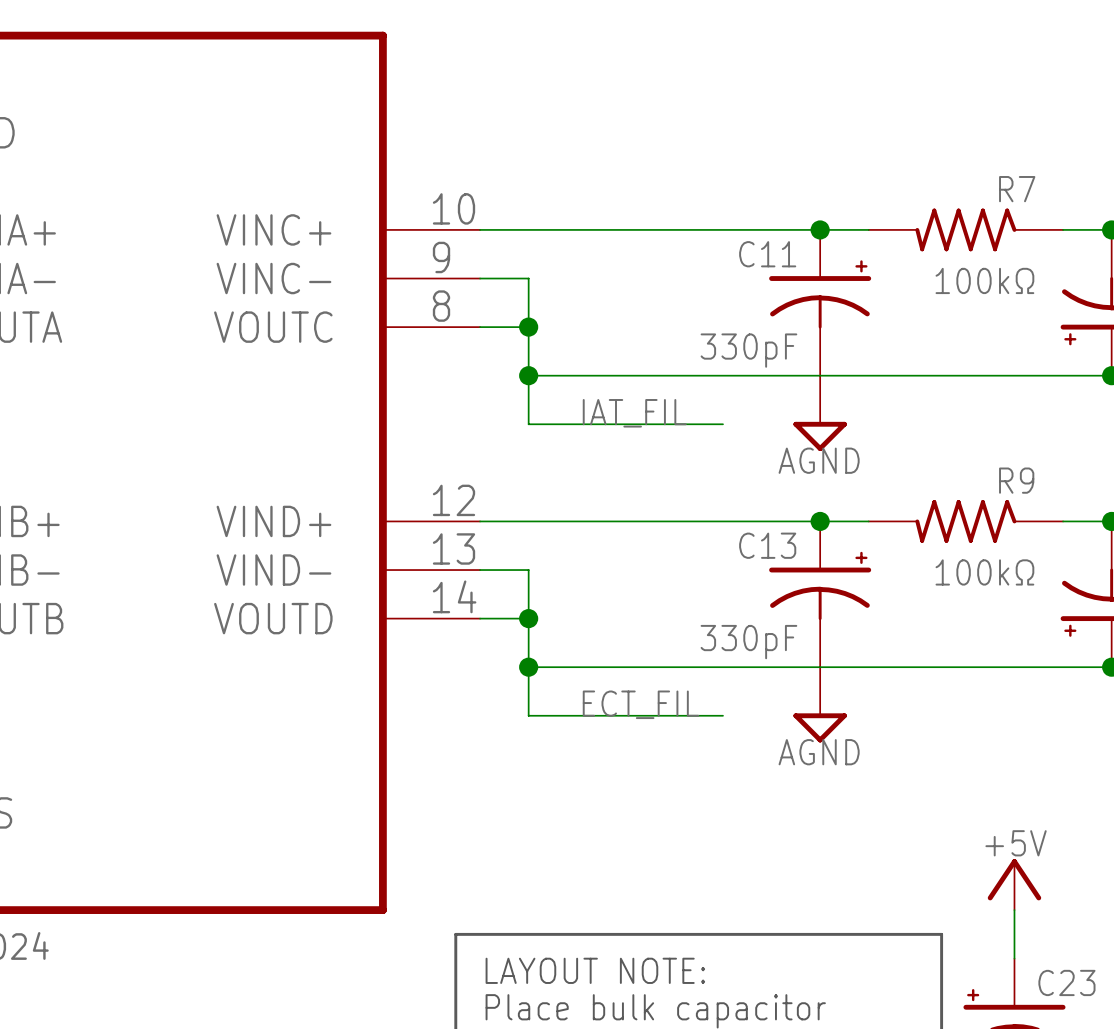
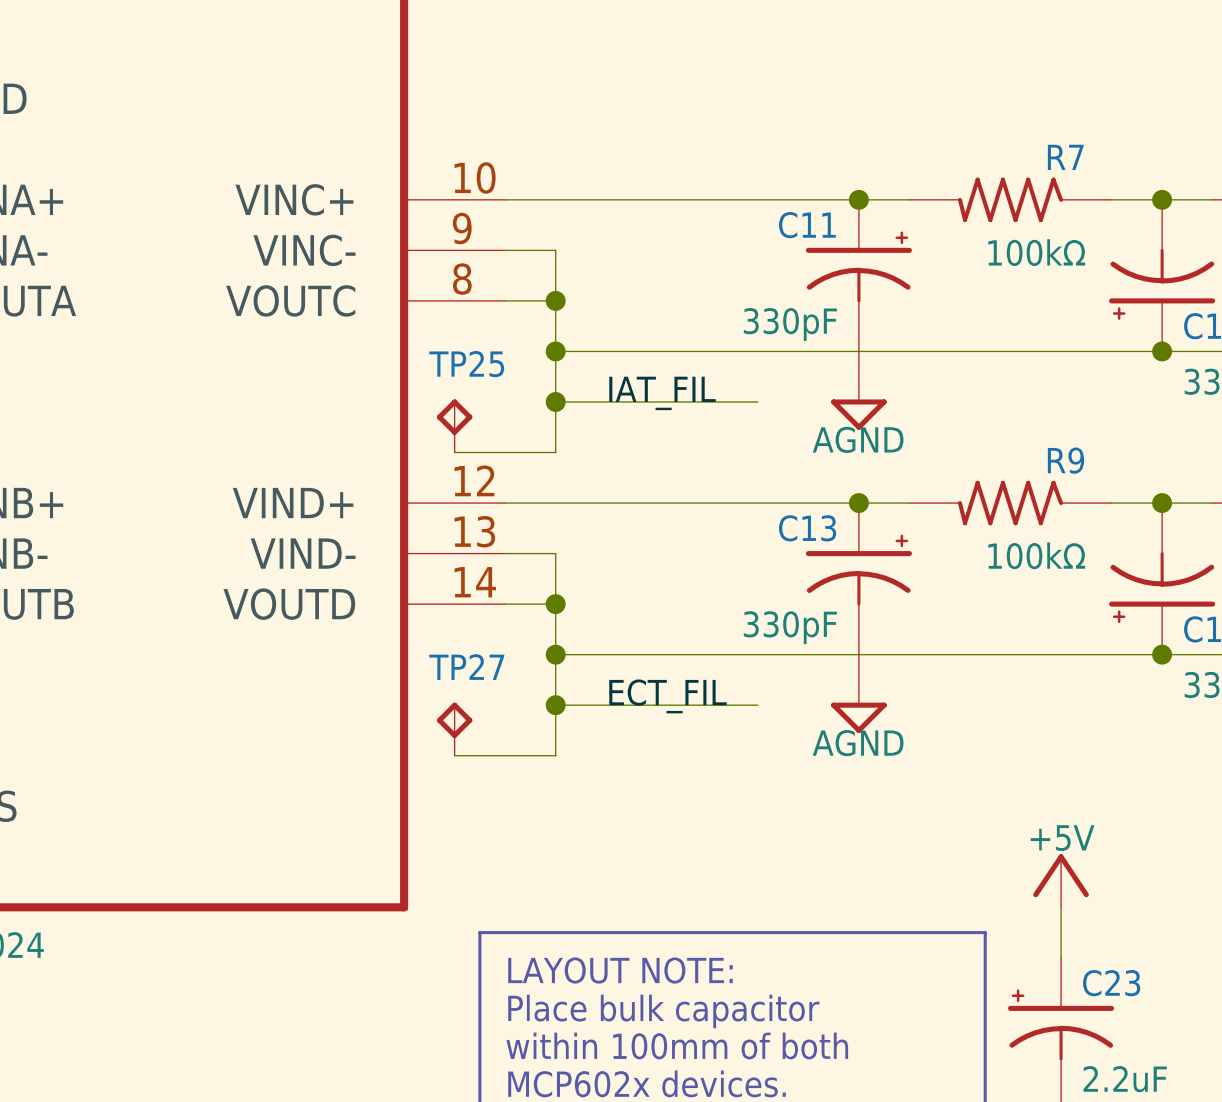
wire: none -> (555, 401) (555, 452) (454, 452)
junction: none -> (555, 401)
TP25: none -> (454, 425)
wire: none -> (555, 705) (555, 755) (454, 755)
junction: none -> (555, 705)
TP27: none -> (454, 729)

